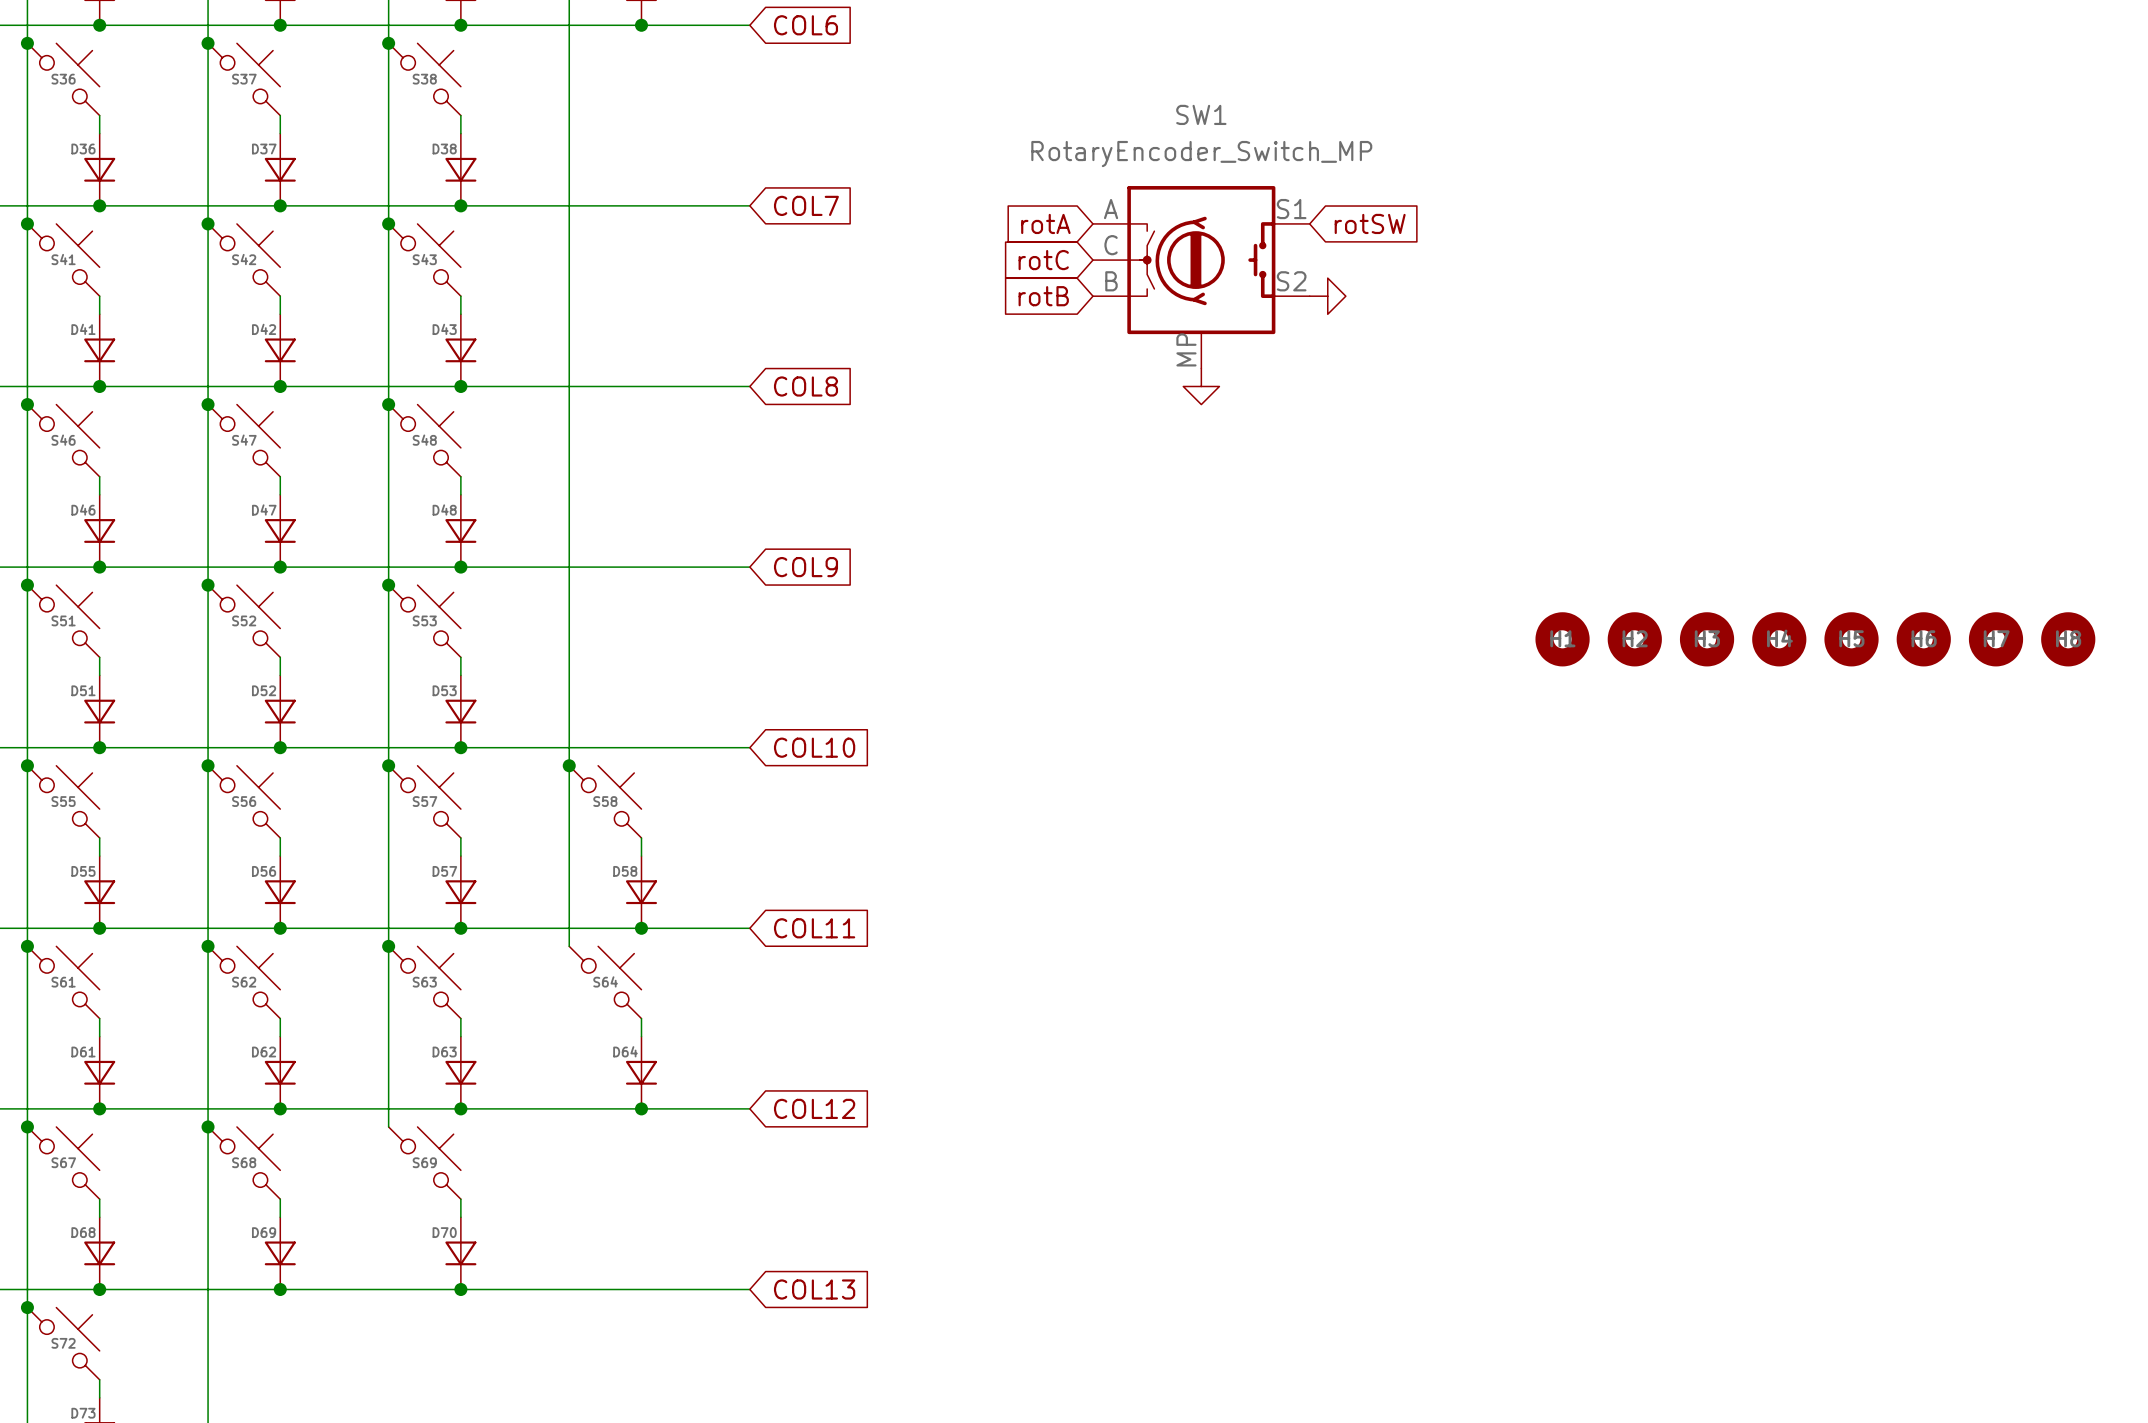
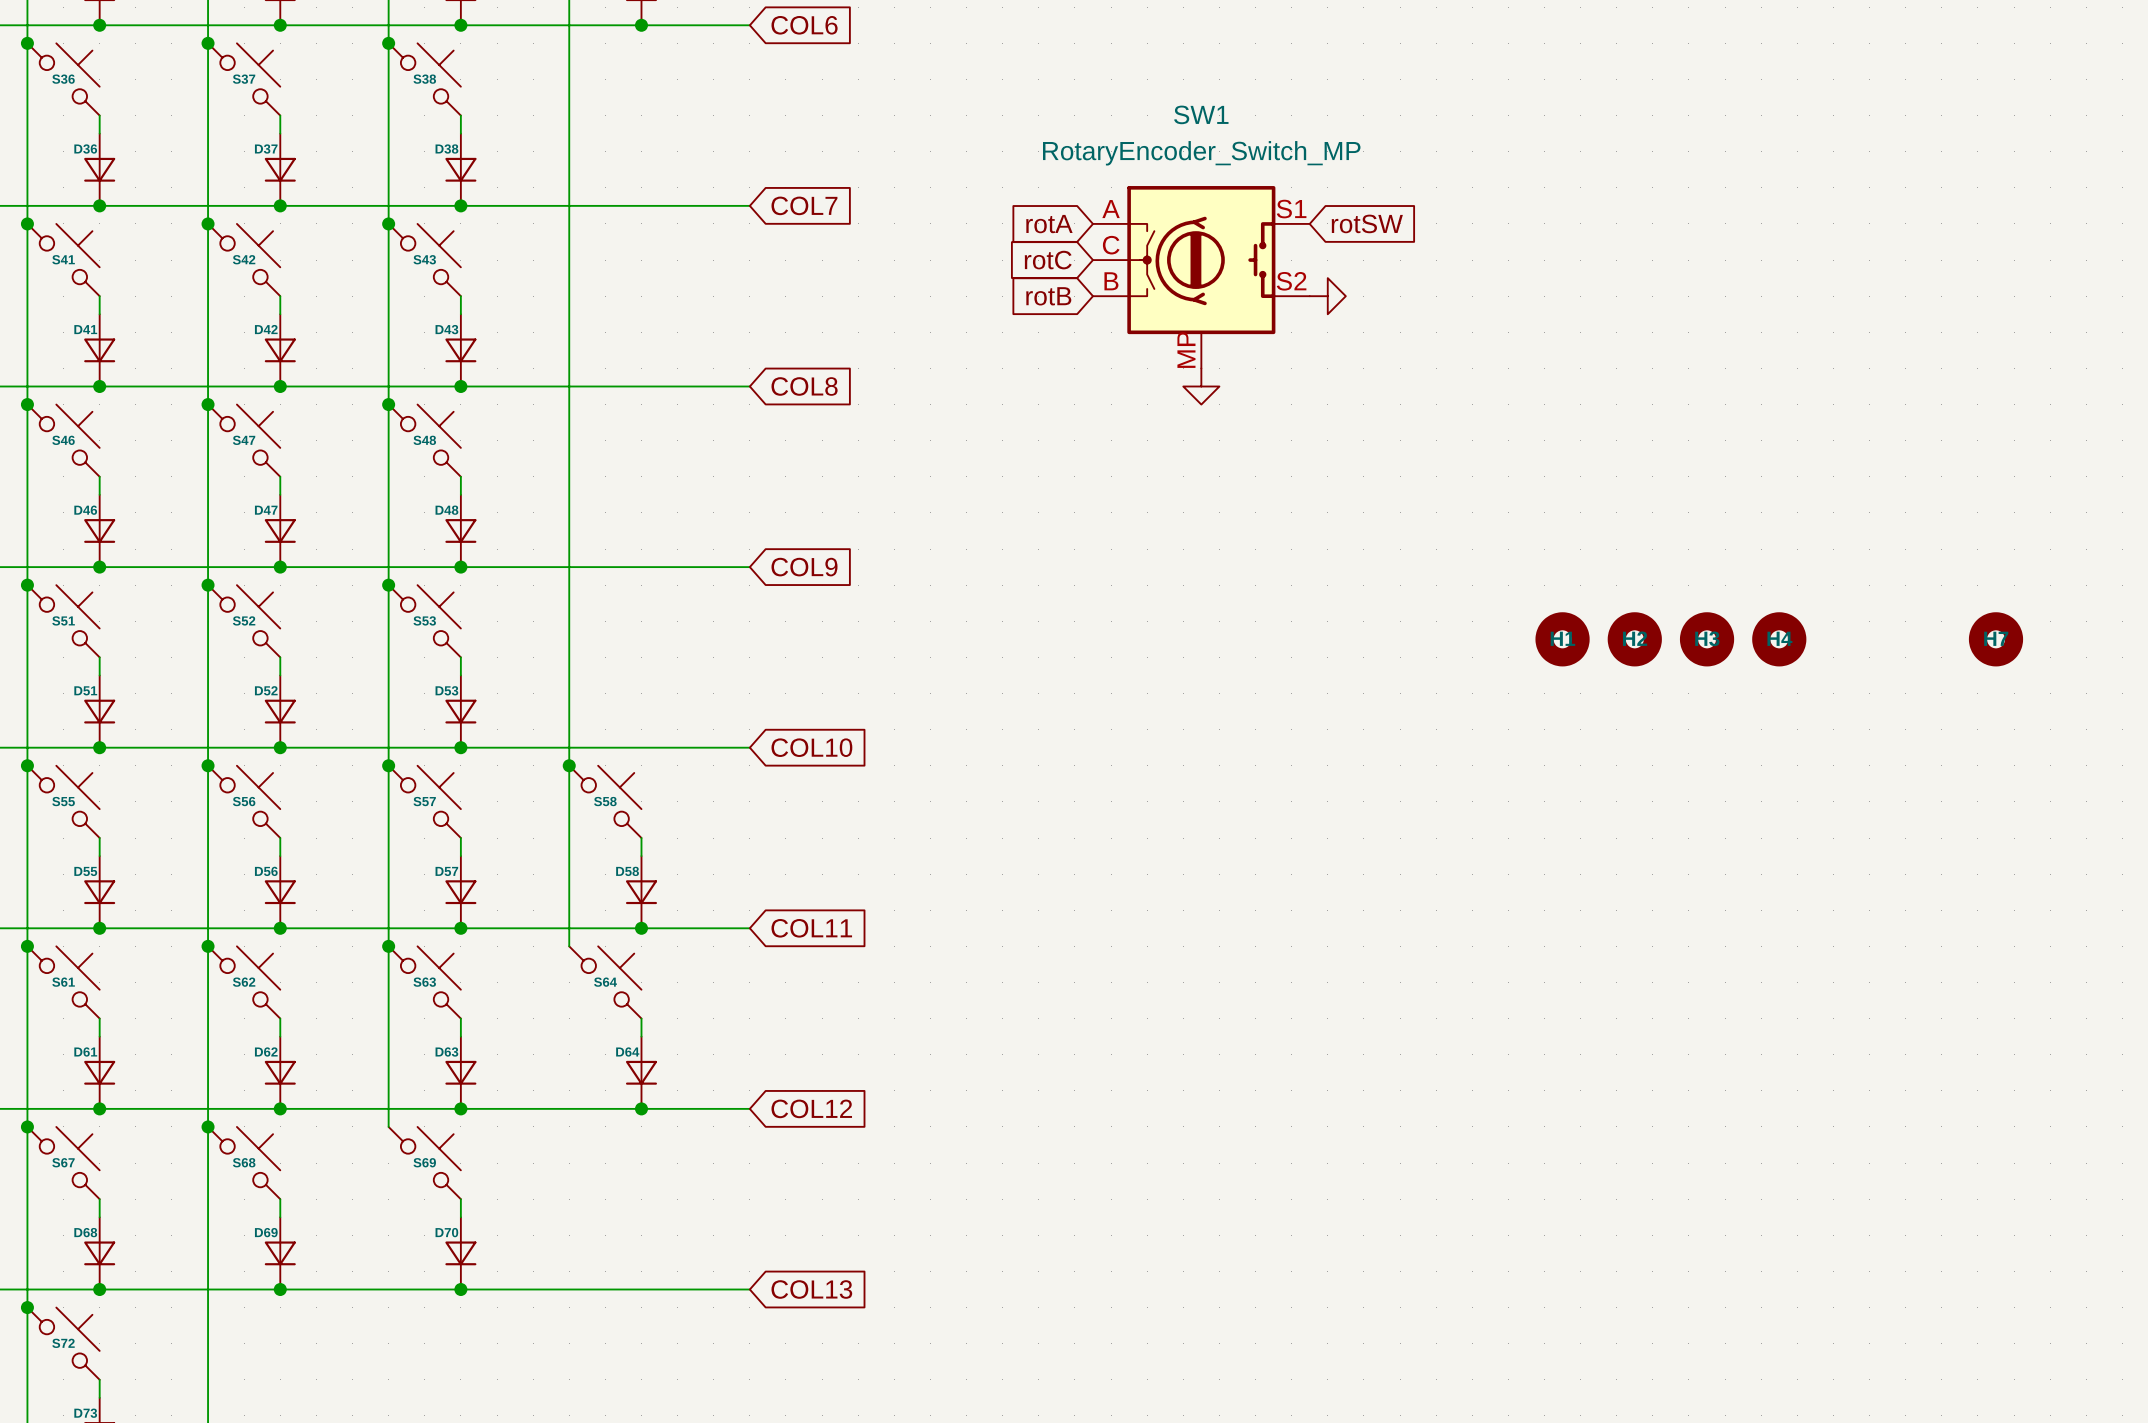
H5: (1851, 639) -> none
H6: (1923, 639) -> none
H8: (2068, 639) -> none

